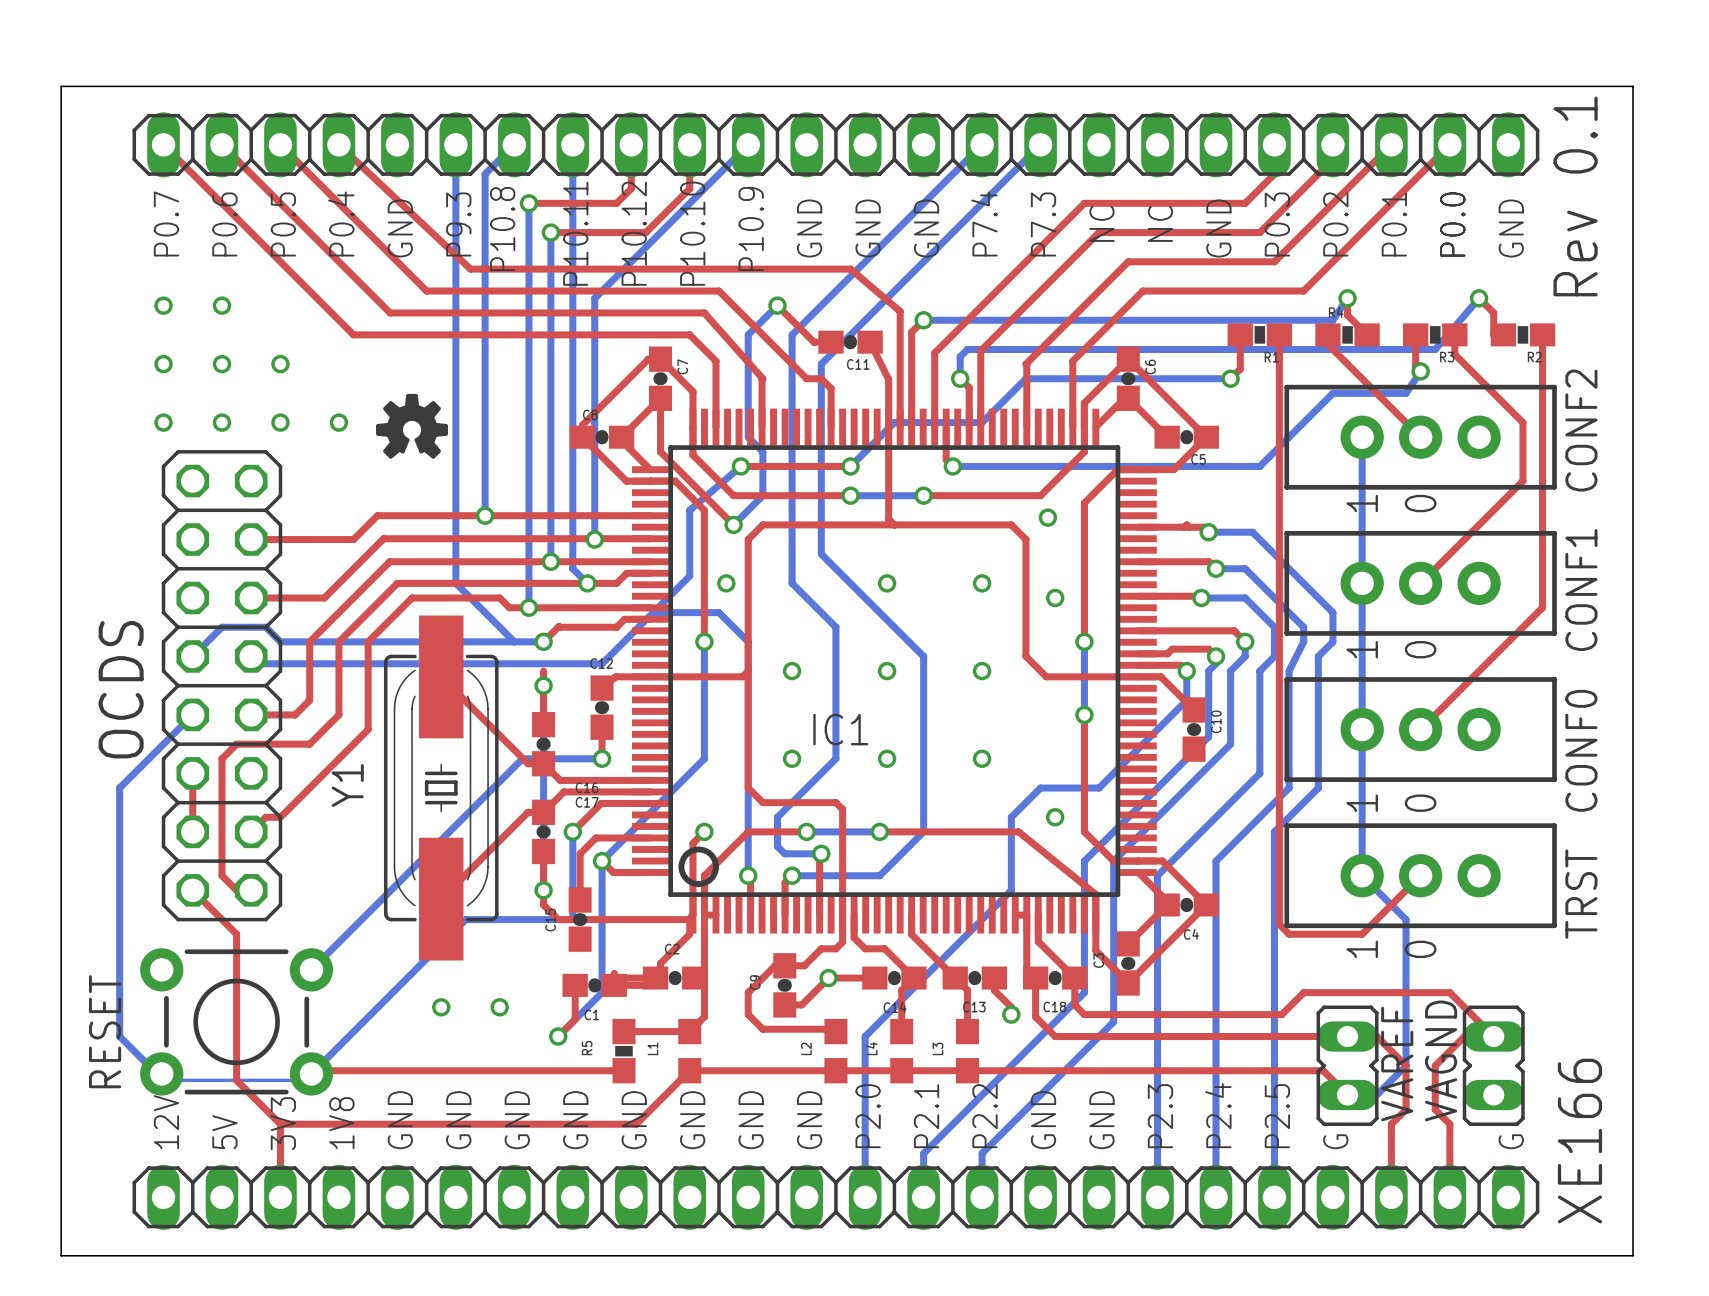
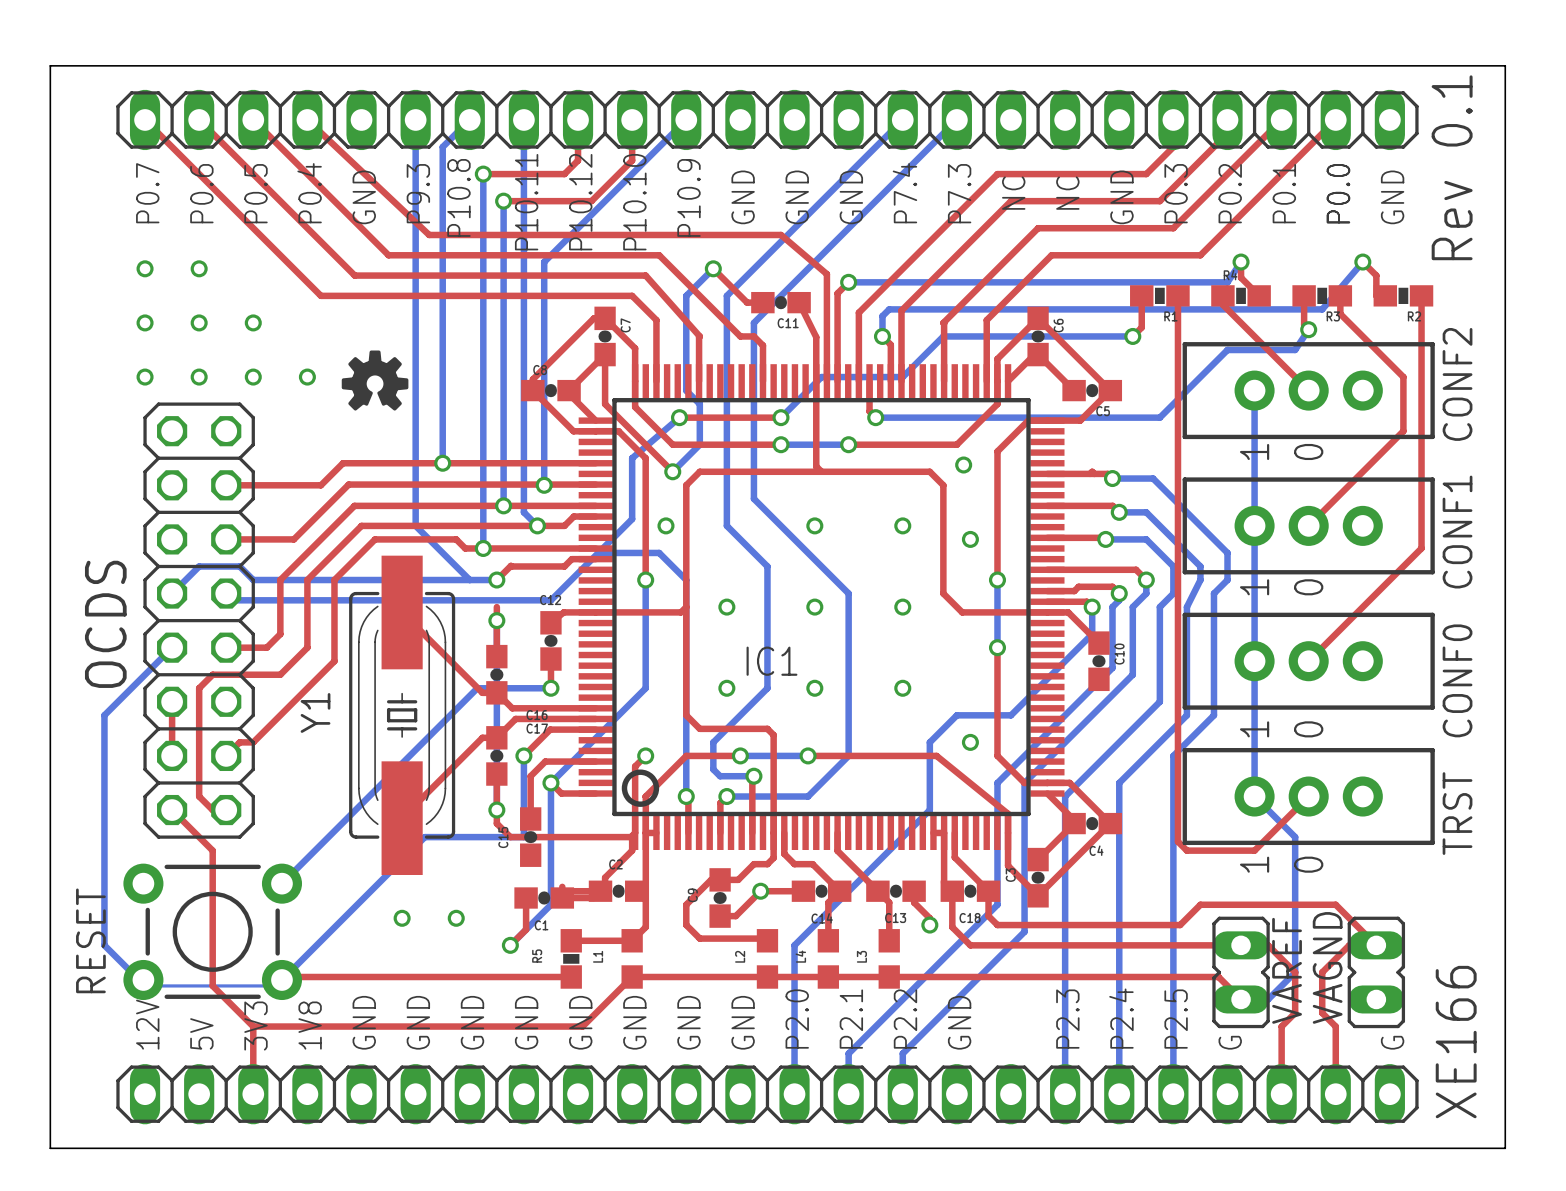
text: GND (1101, 1120) -> none

